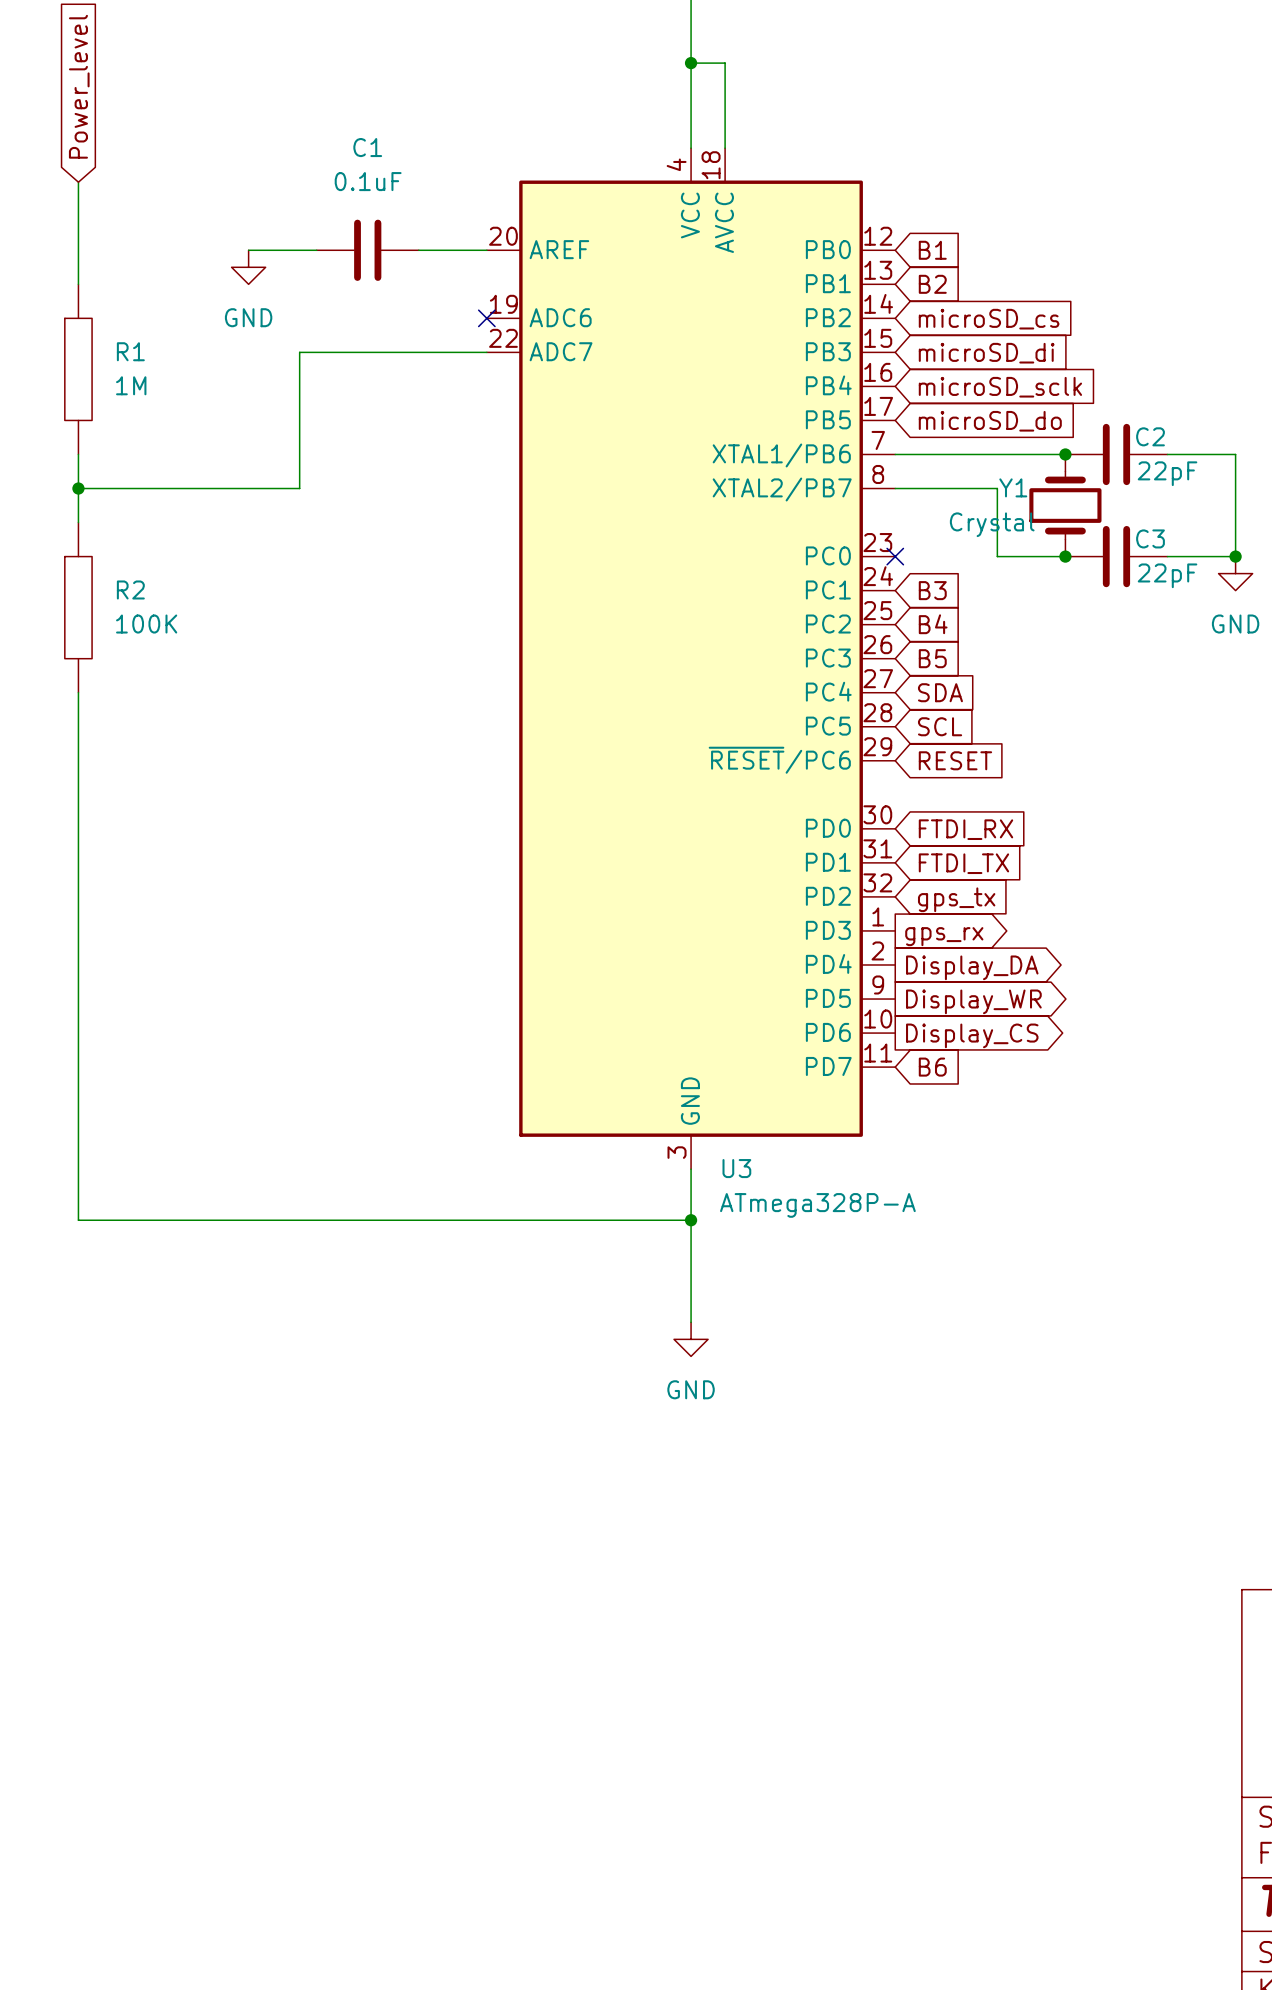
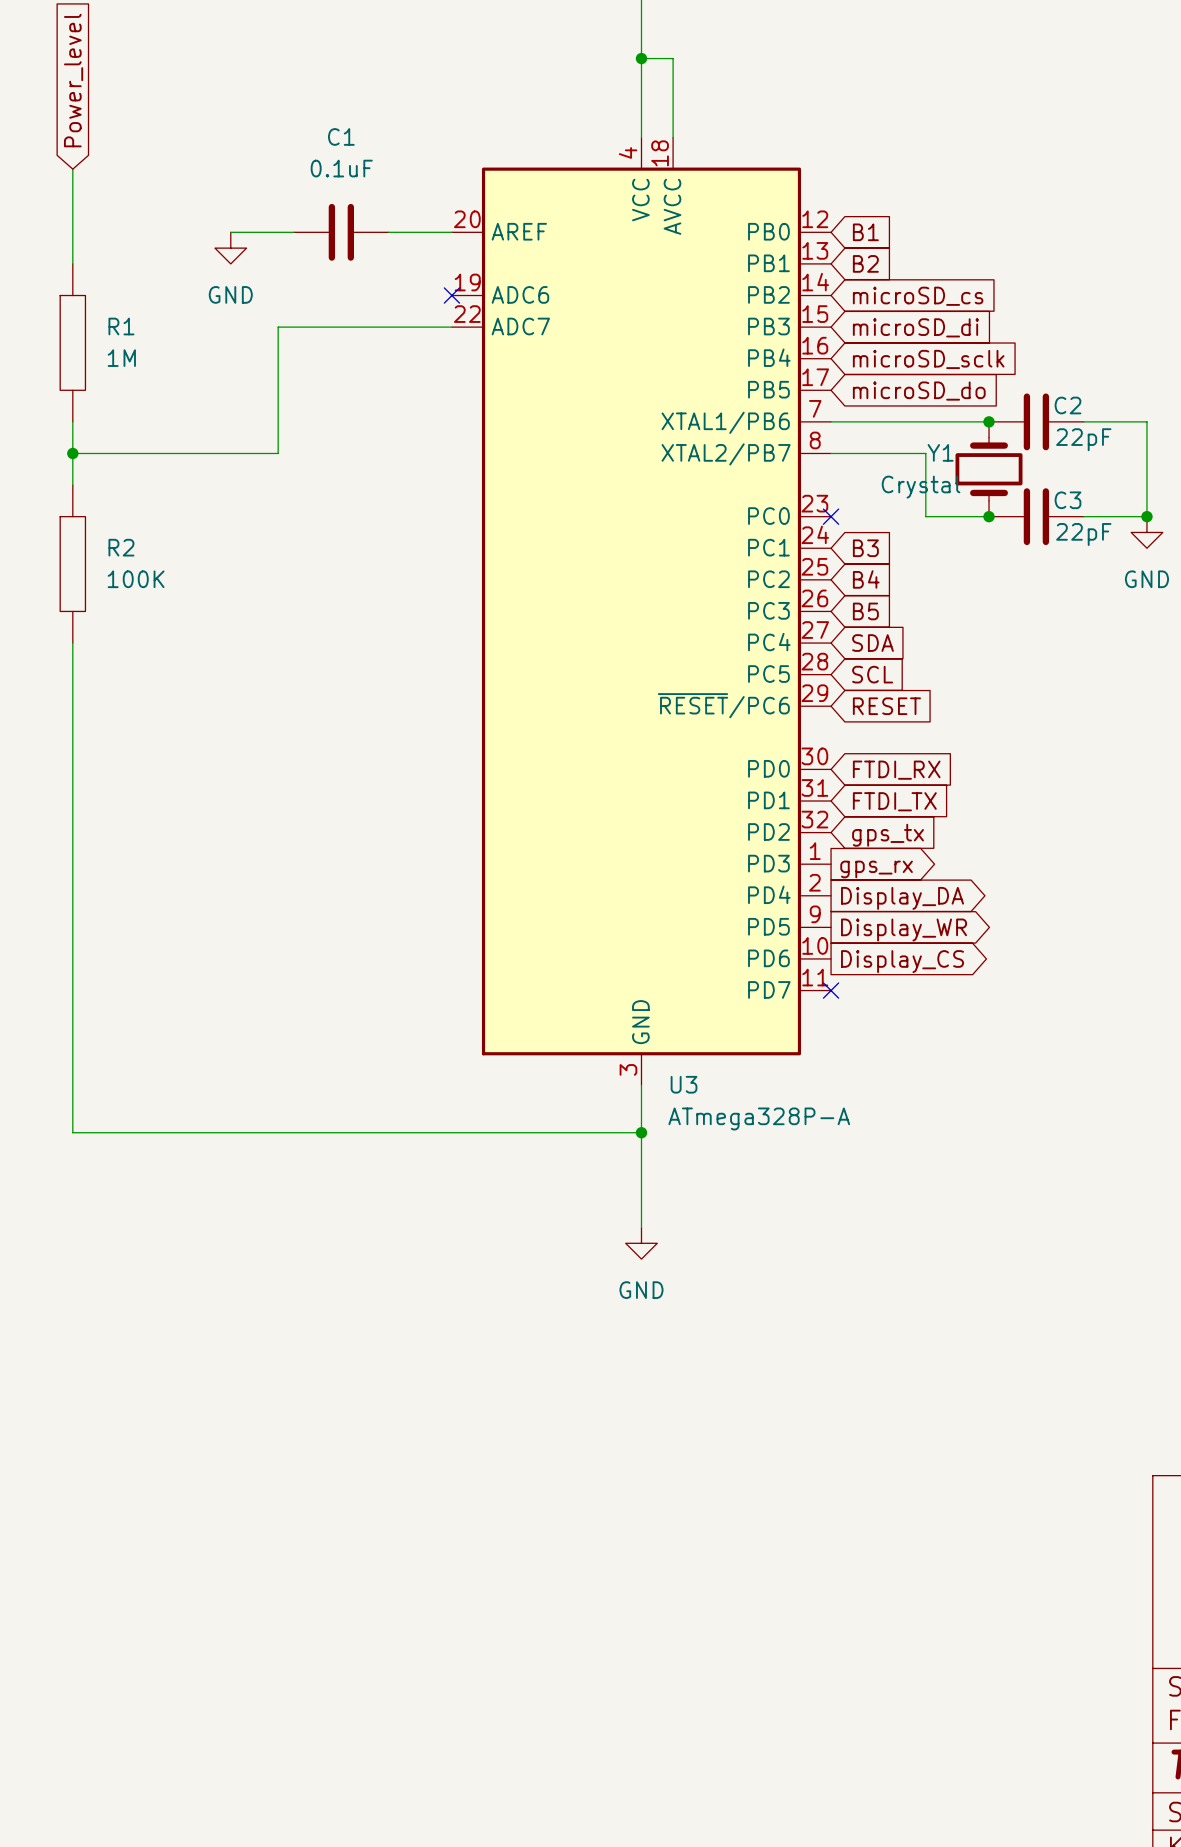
no-connect mark: none -> (831, 990)
global label: B6 (932, 1067) -> none

